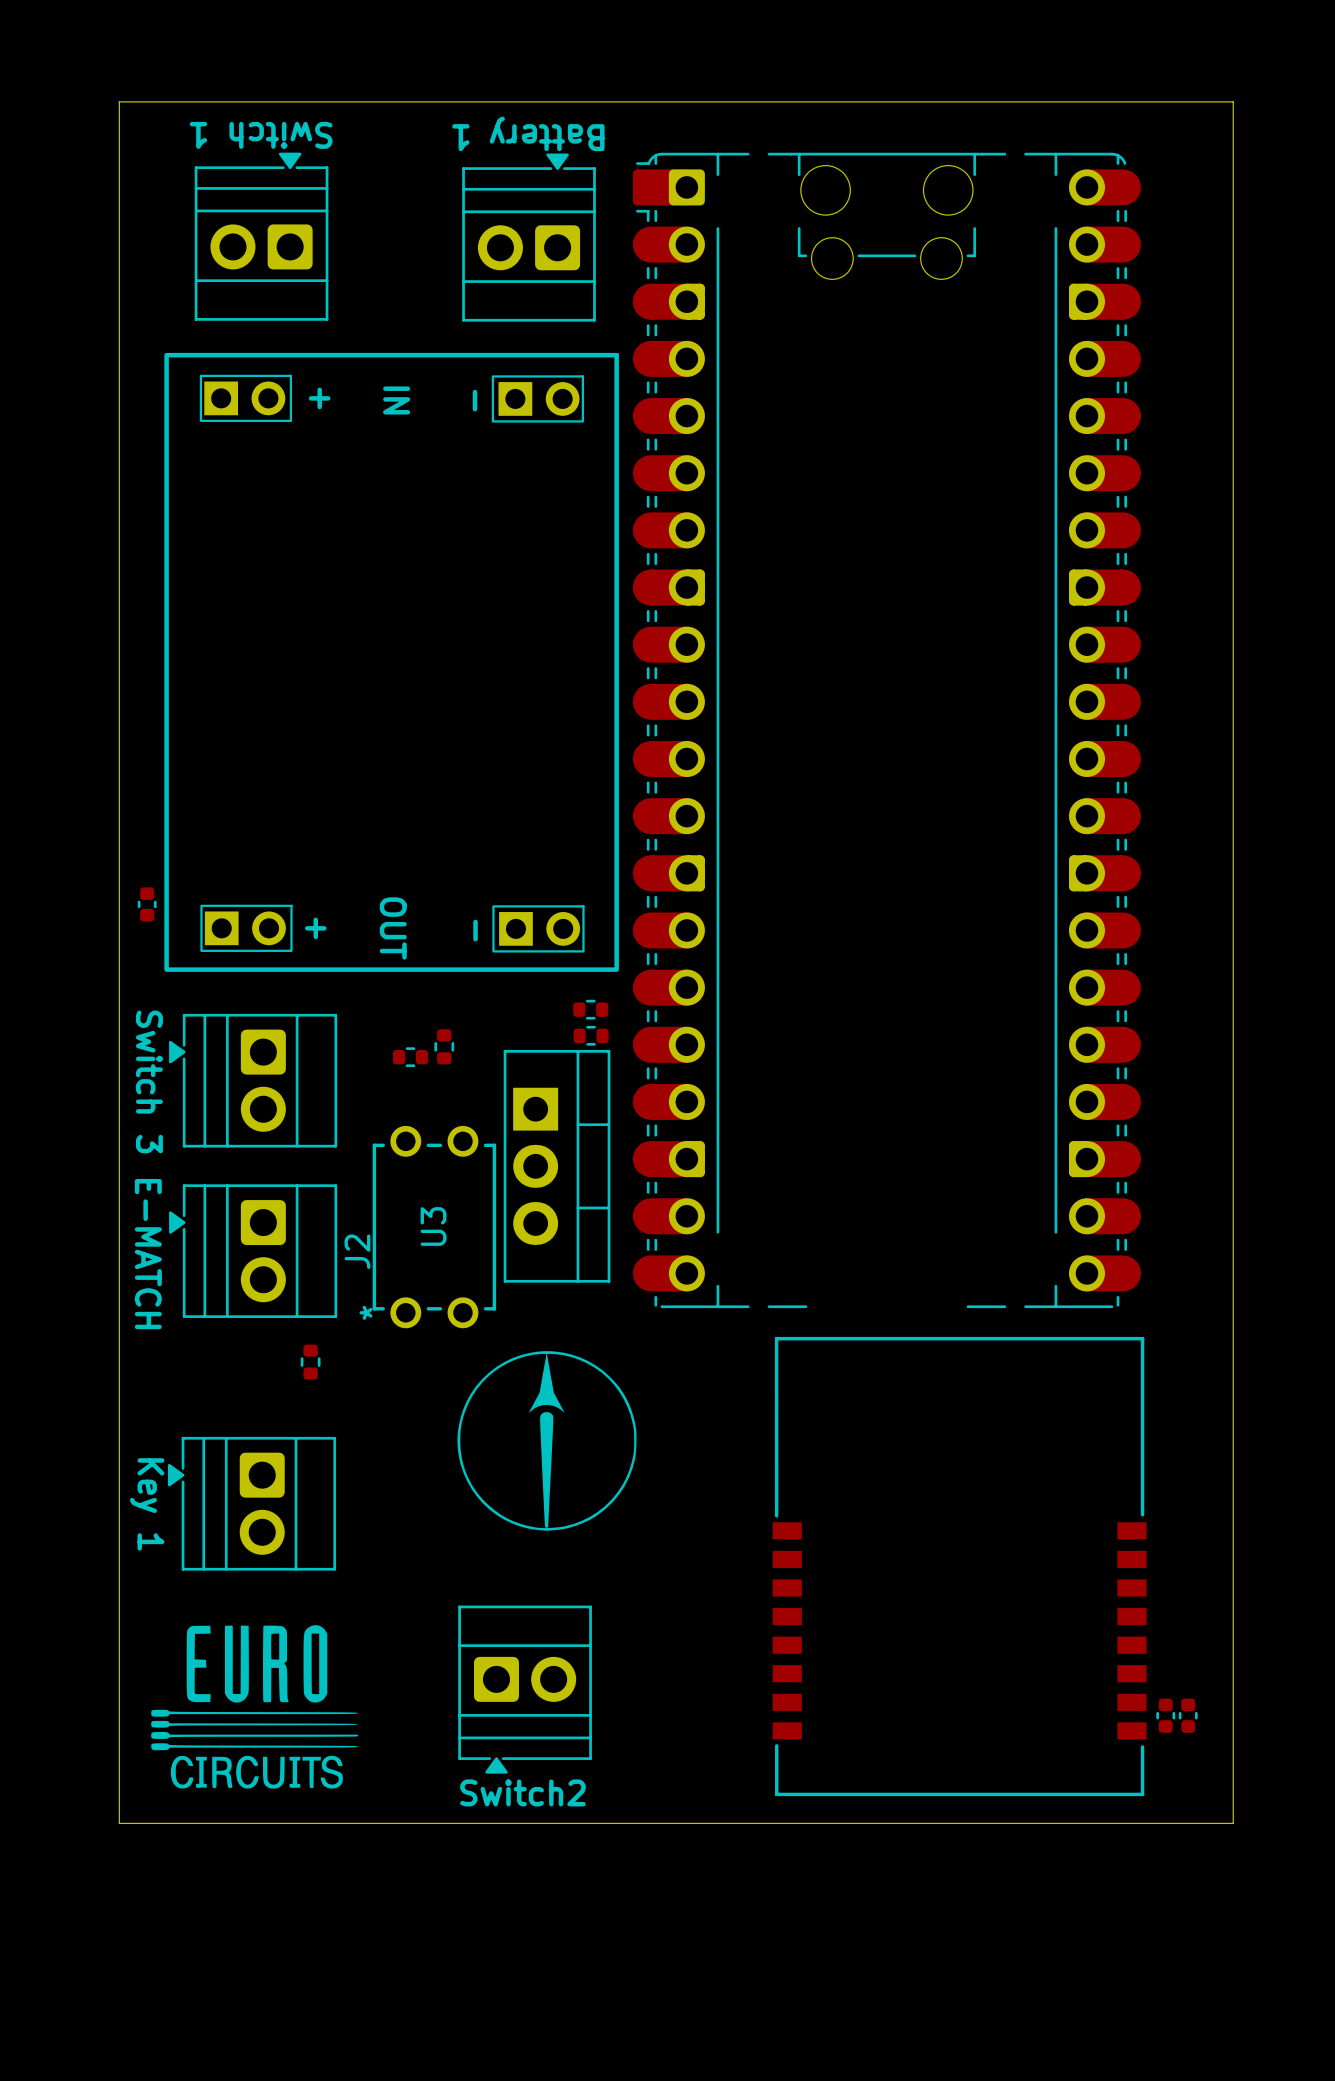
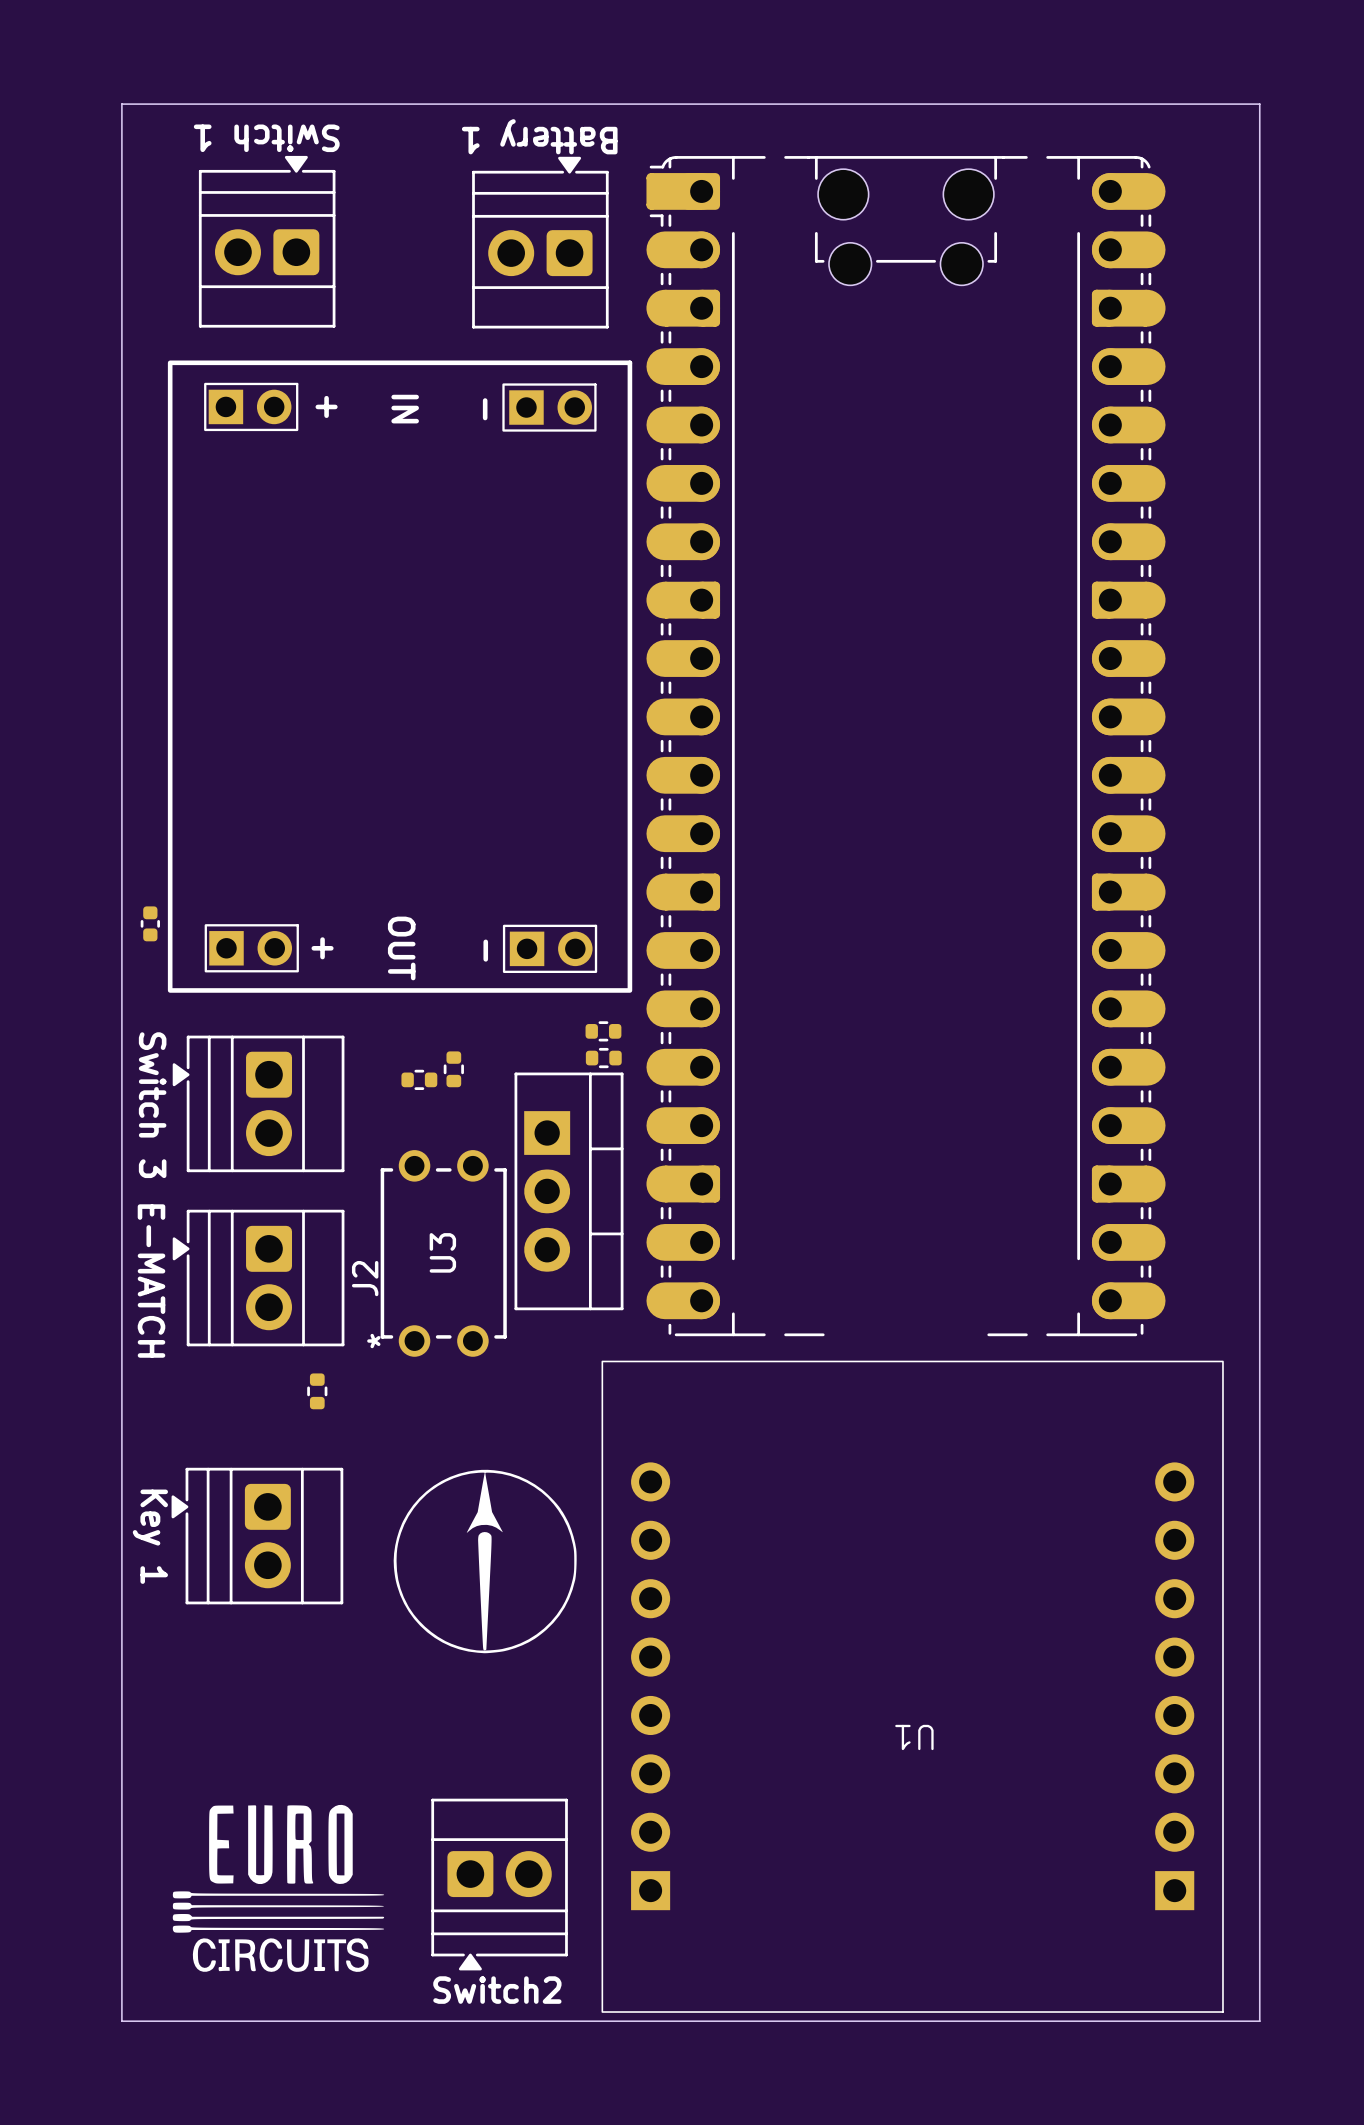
drawing position: (546, 1440) -> (485, 1561)
part: (959, 1566) -> none
U1: none -> (912, 1686)
Switch2 position: (525, 1689) -> (499, 1884)
drawing position: (254, 1706) -> (278, 1888)
part: (1165, 1715) -> none
part: (1188, 1715) -> none
board edge: (119, 1823) (1233, 1823) -> (121, 1862) (121, 2021) (1259, 2021) (1259, 1862)

